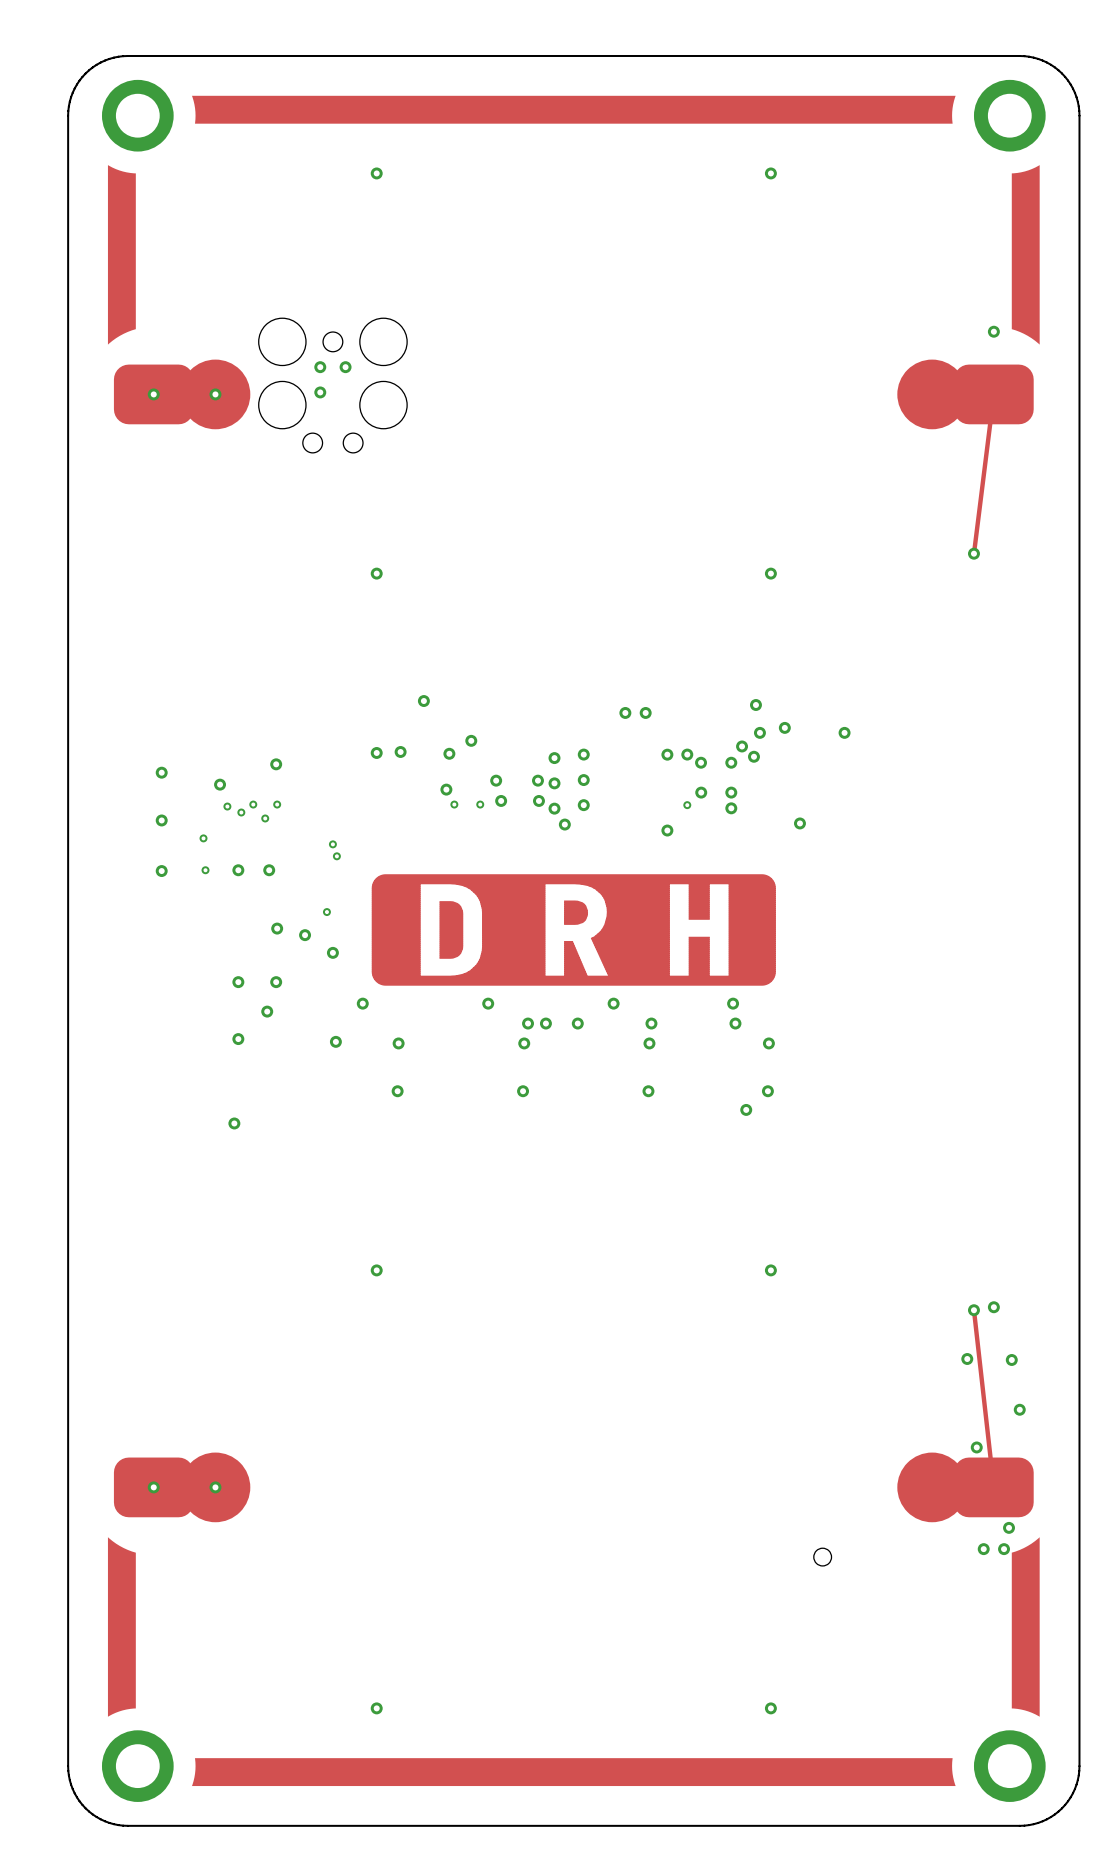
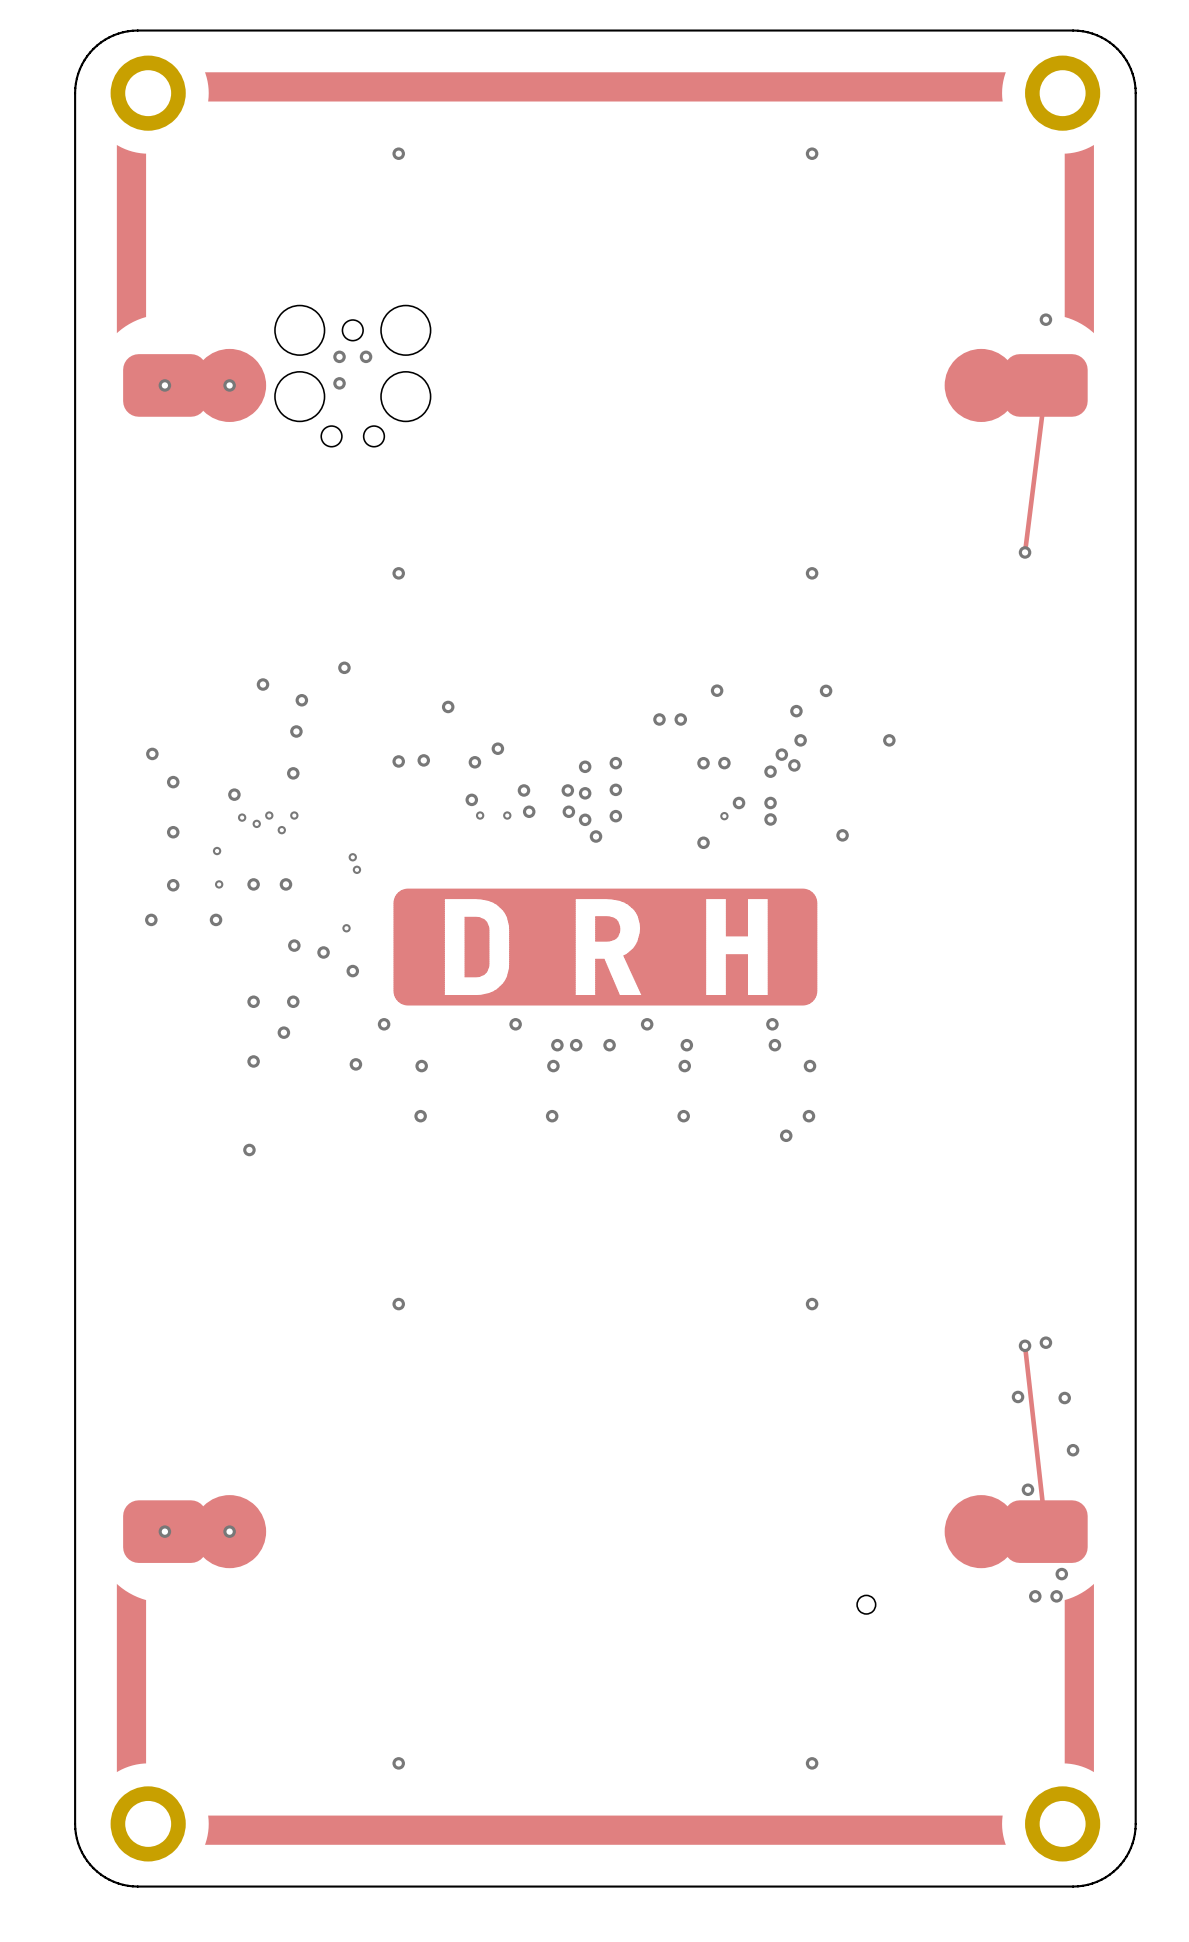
via: none -> (344, 667)
via: none -> (263, 684)
via: none -> (717, 690)
via: none -> (301, 700)
via: none -> (296, 731)
via position: (784, 727) -> (826, 690)
via: none -> (152, 753)
via: (701, 762) -> none
via: none -> (151, 919)
via: none -> (216, 919)

